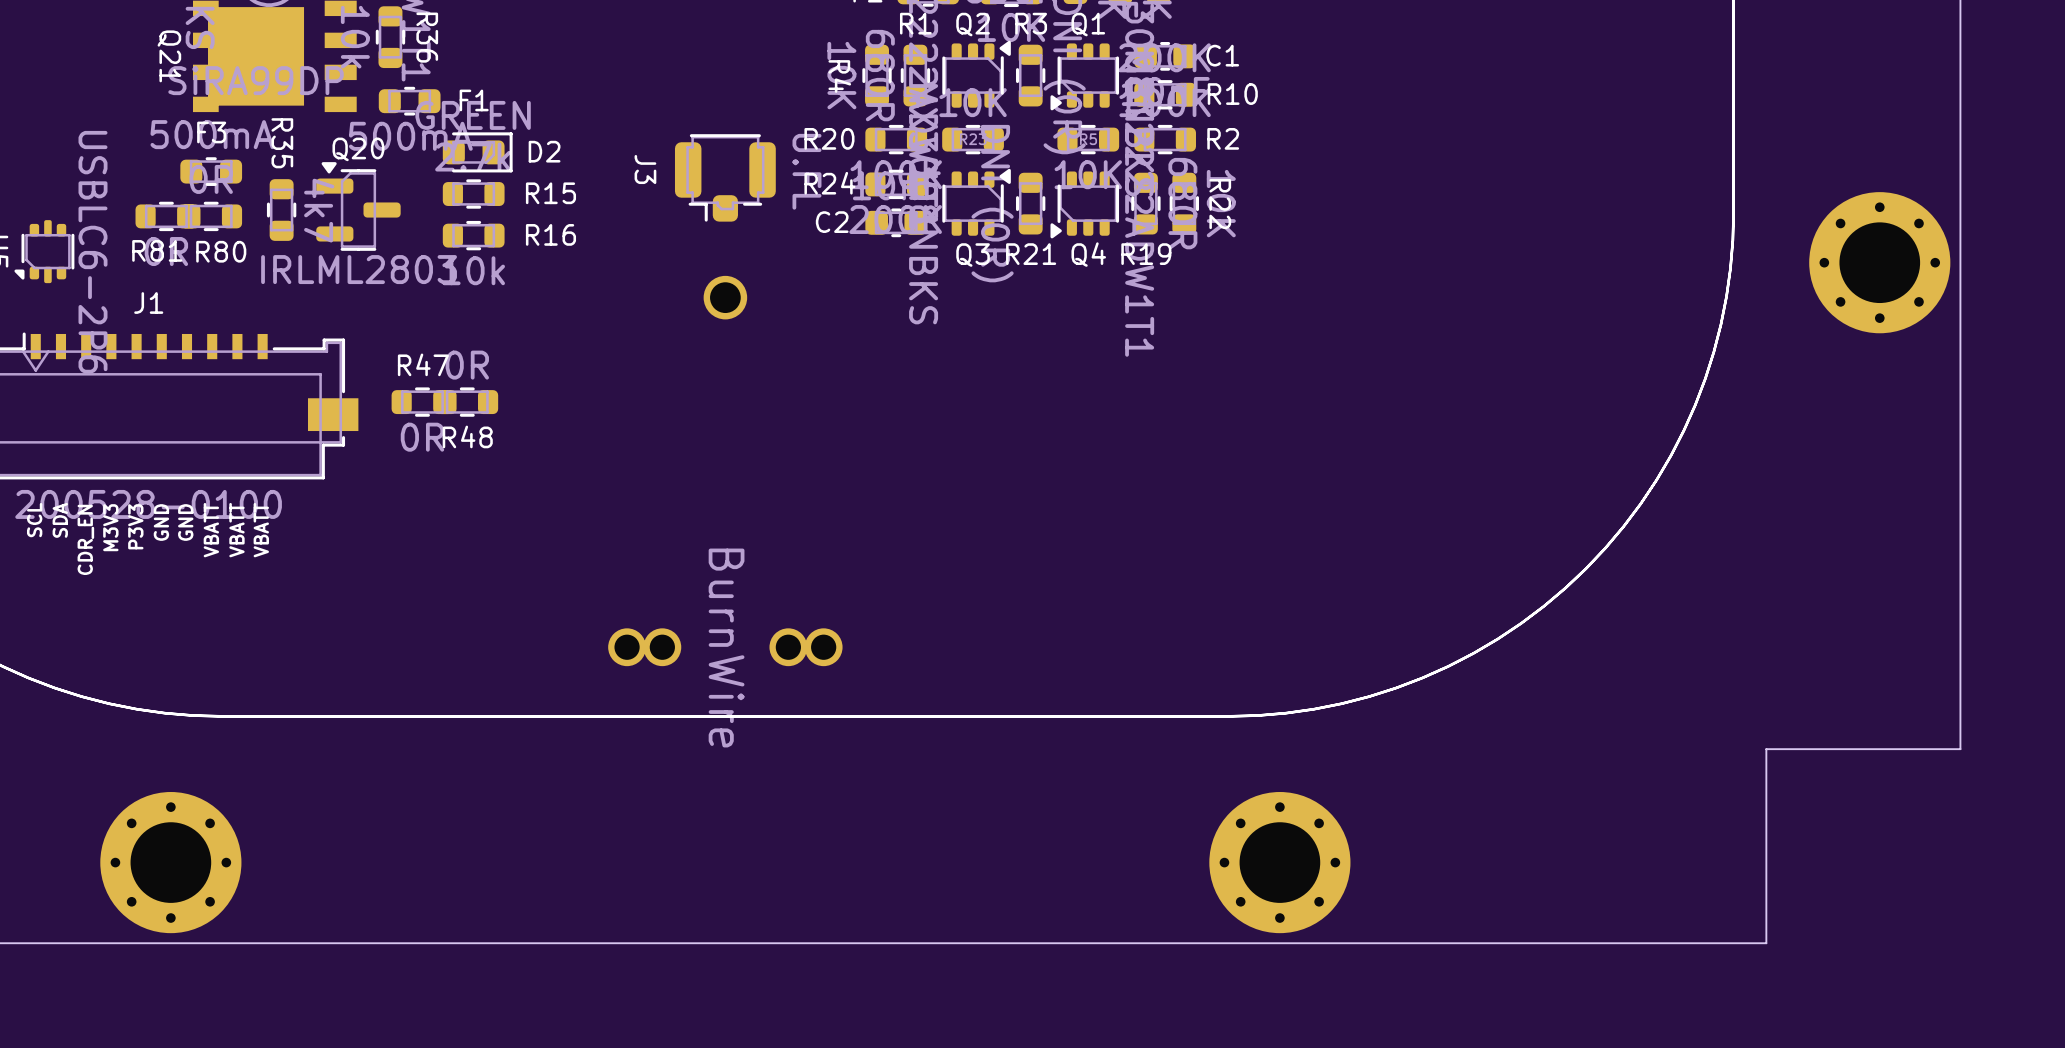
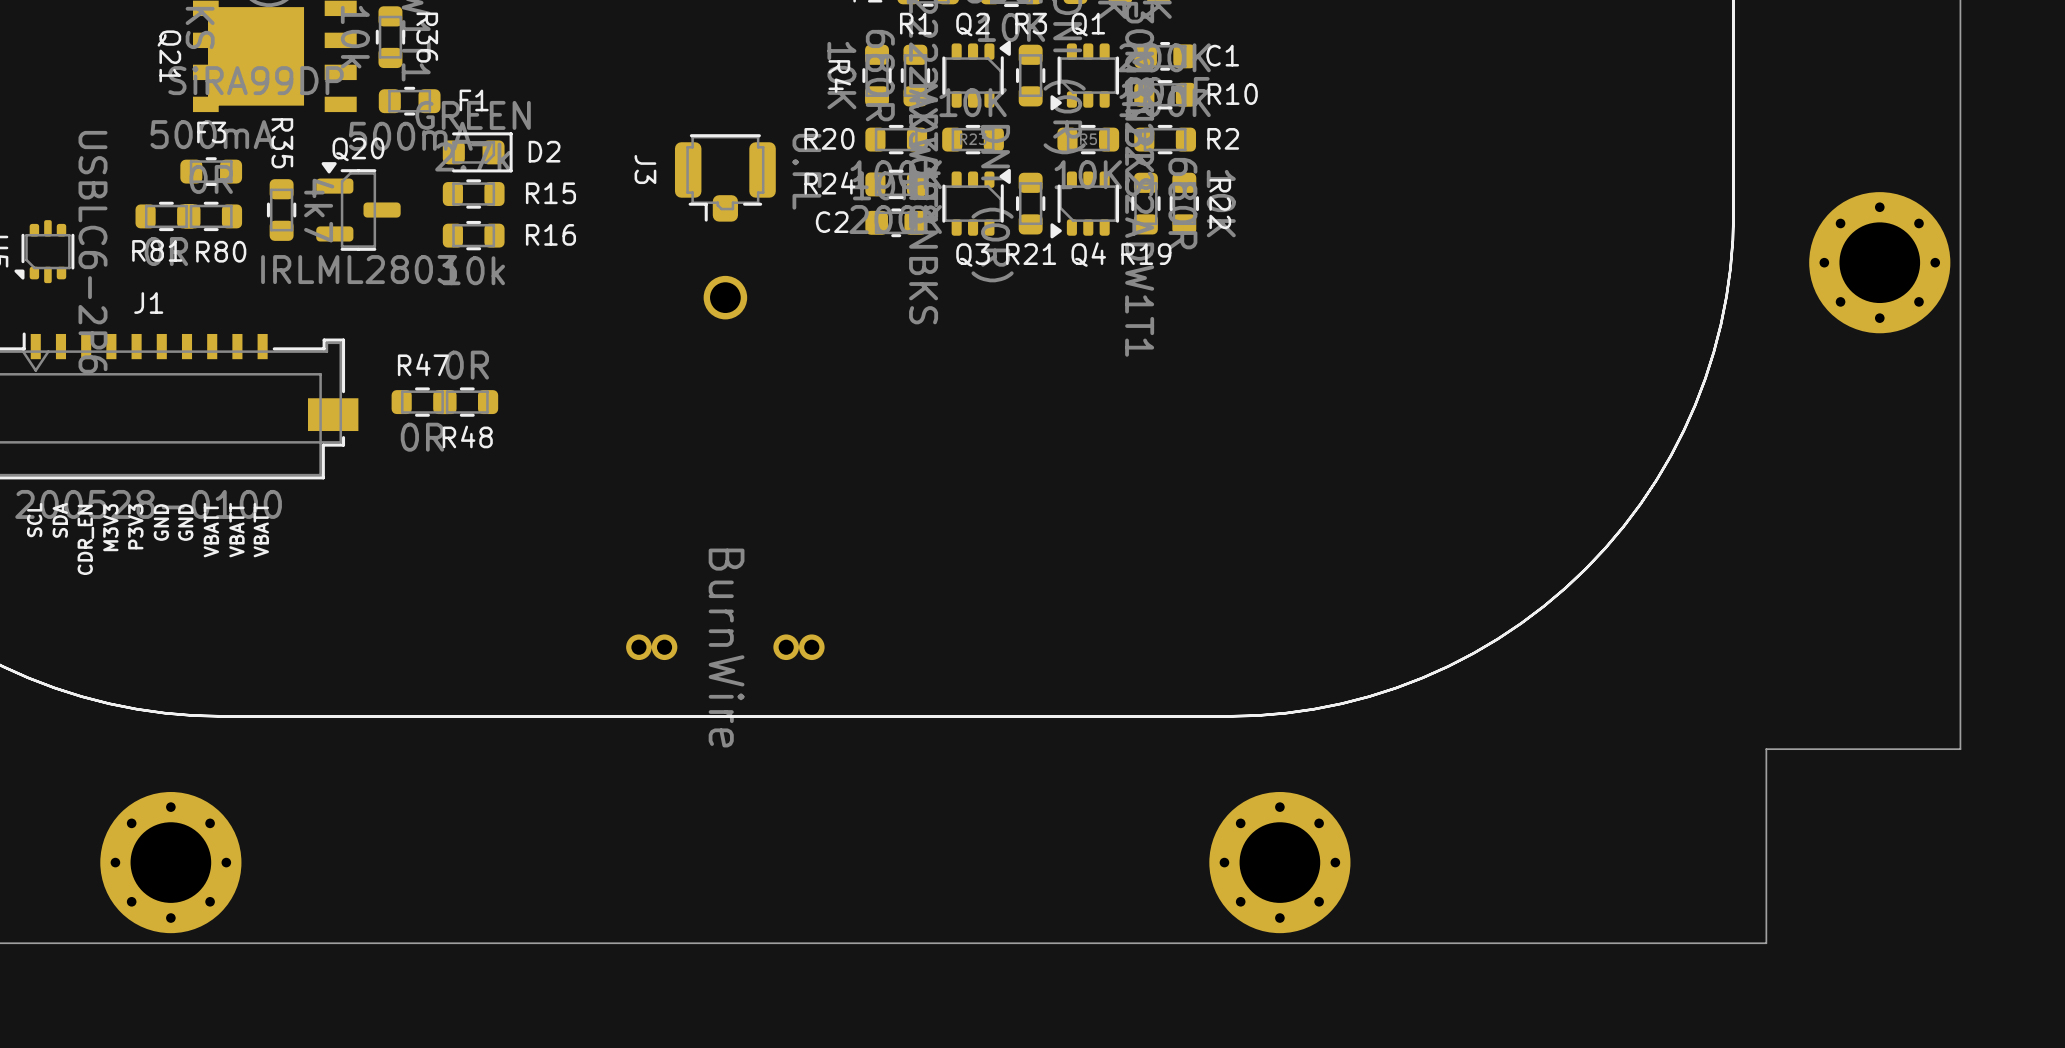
part footprint: [608, 628, 843, 667] -> [626, 634, 825, 661]

